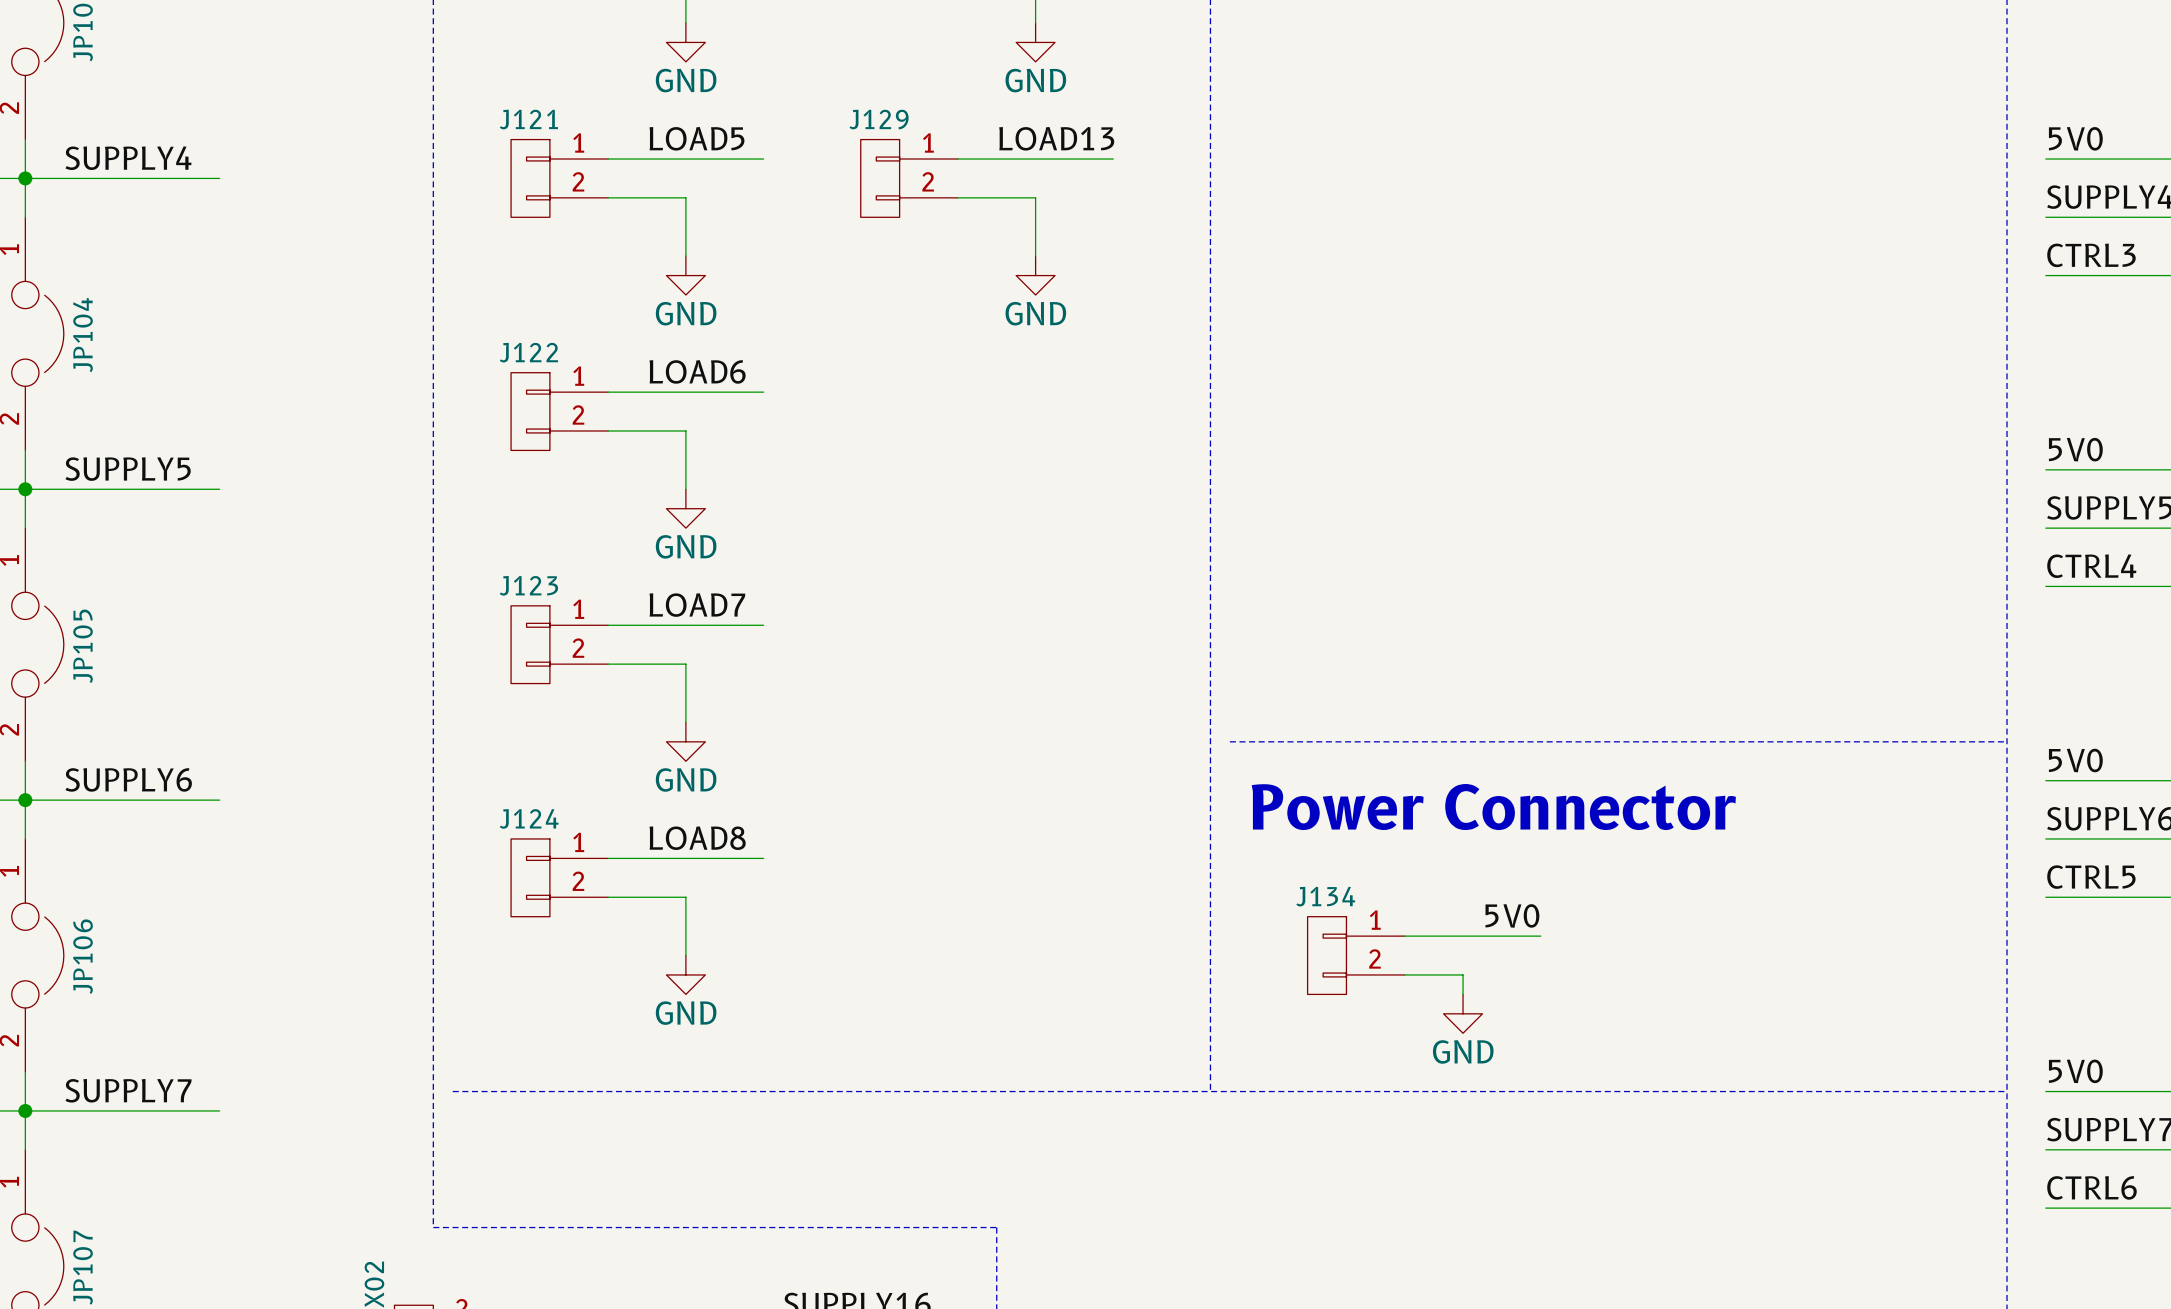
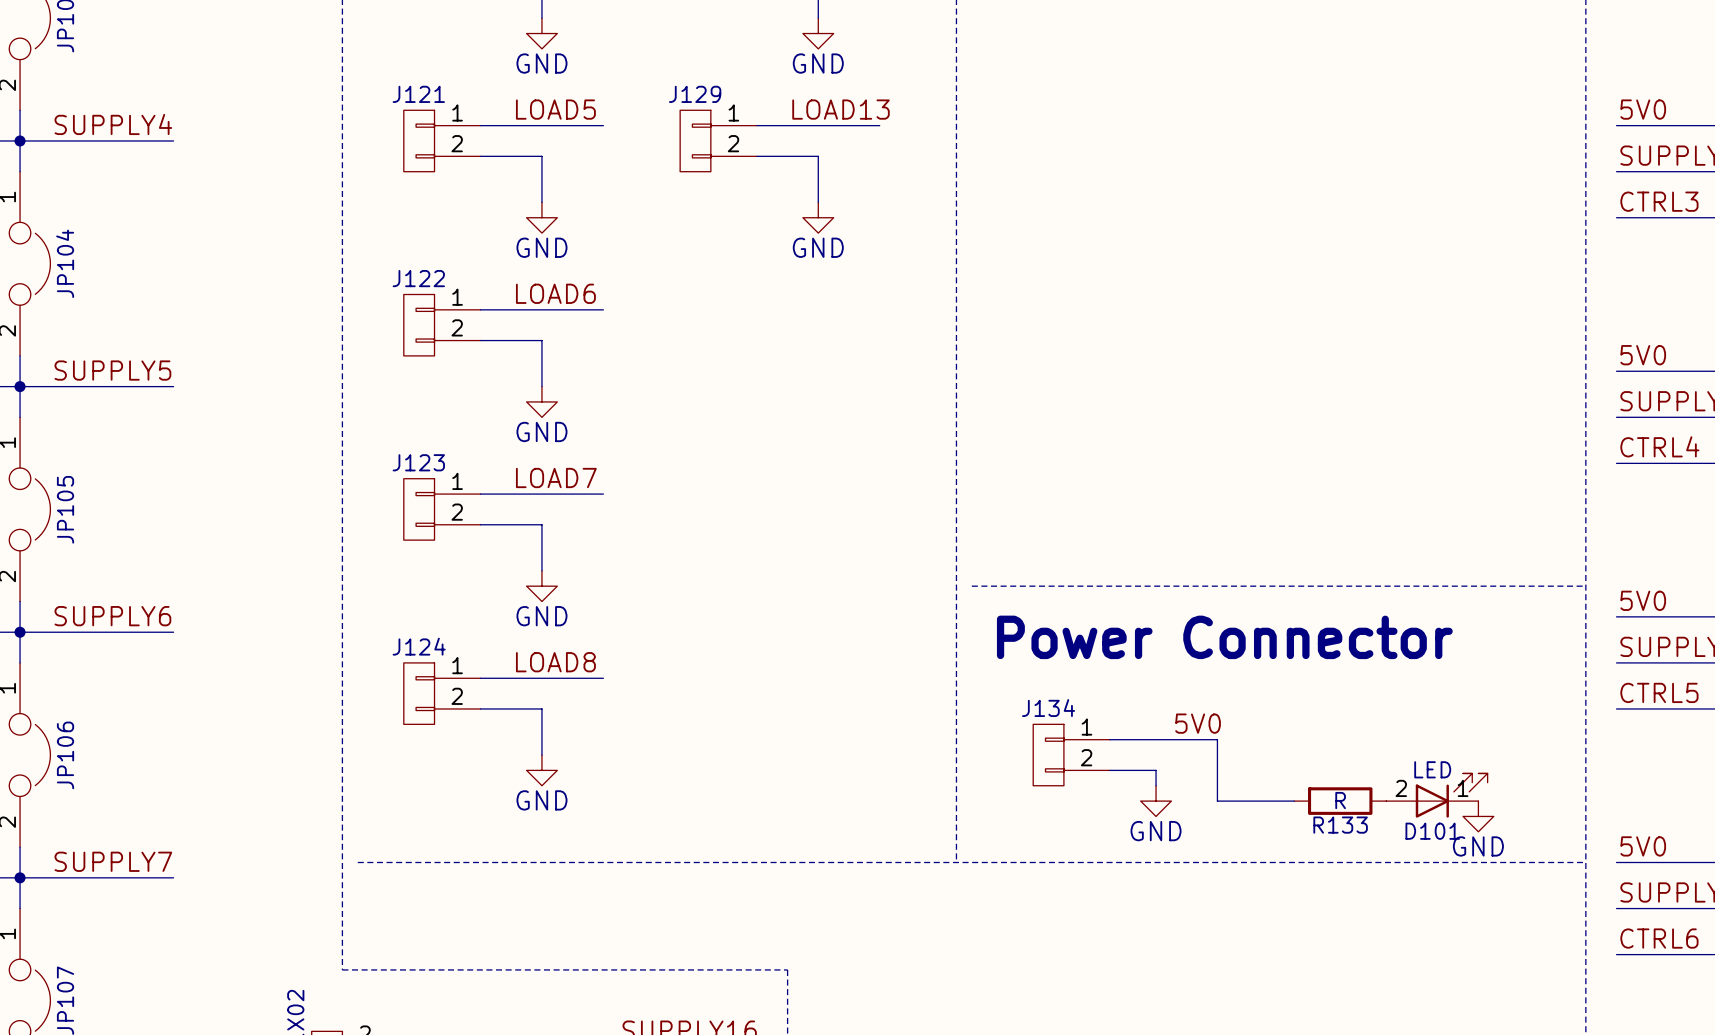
wire: none -> (1217, 739) (1217, 801) (1294, 801)
D101: none -> LED (1436, 795)
R133: none -> R (1340, 801)
power symbol: none -> GND (1478, 816)

